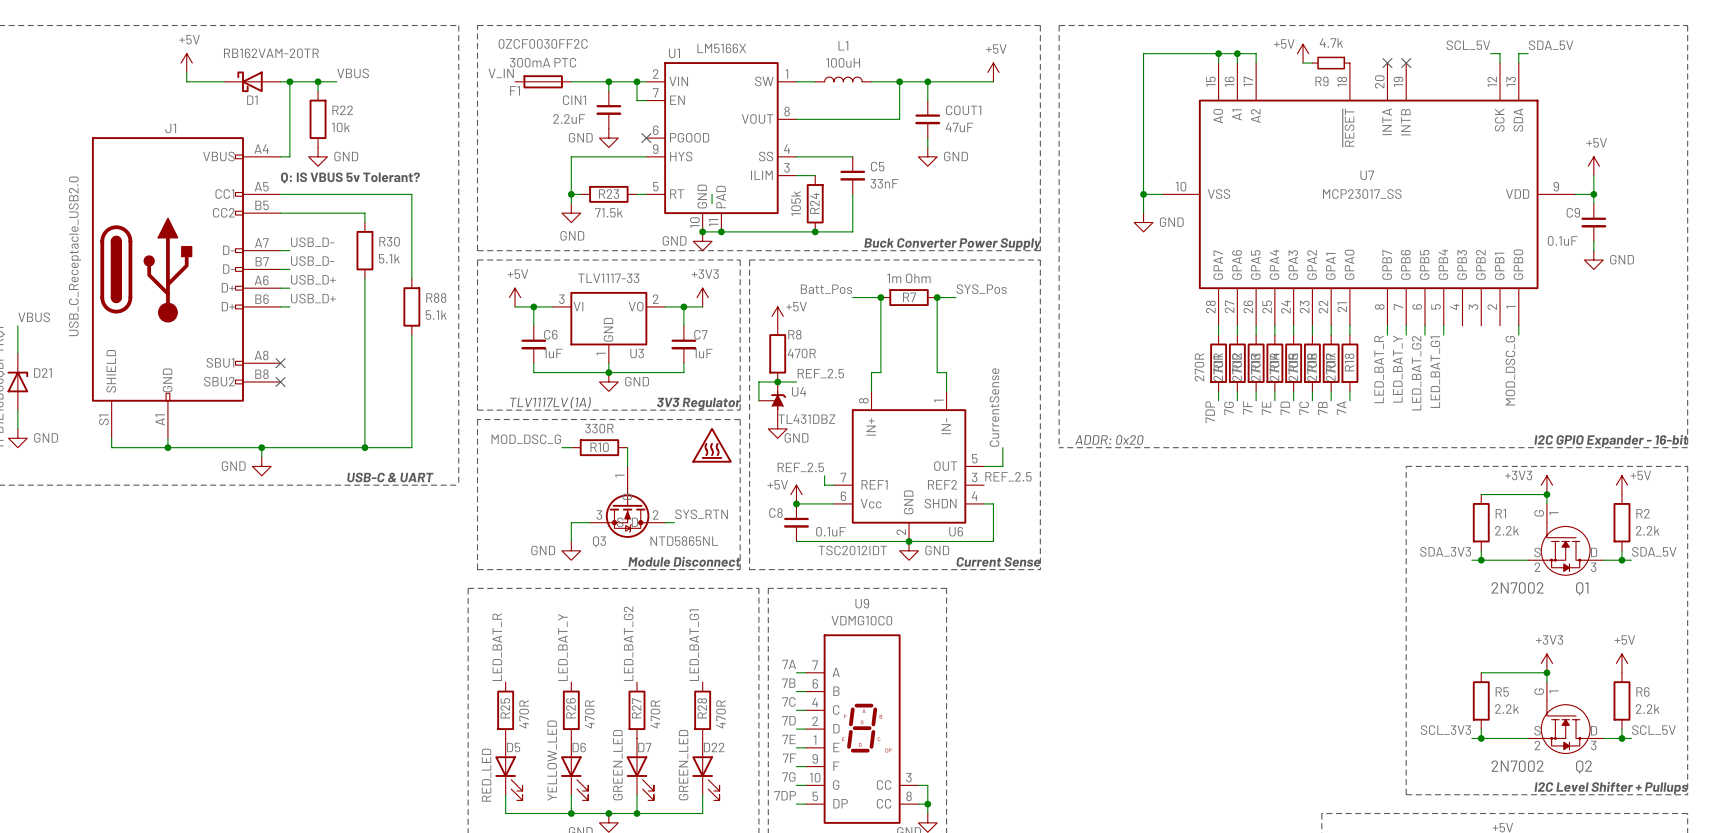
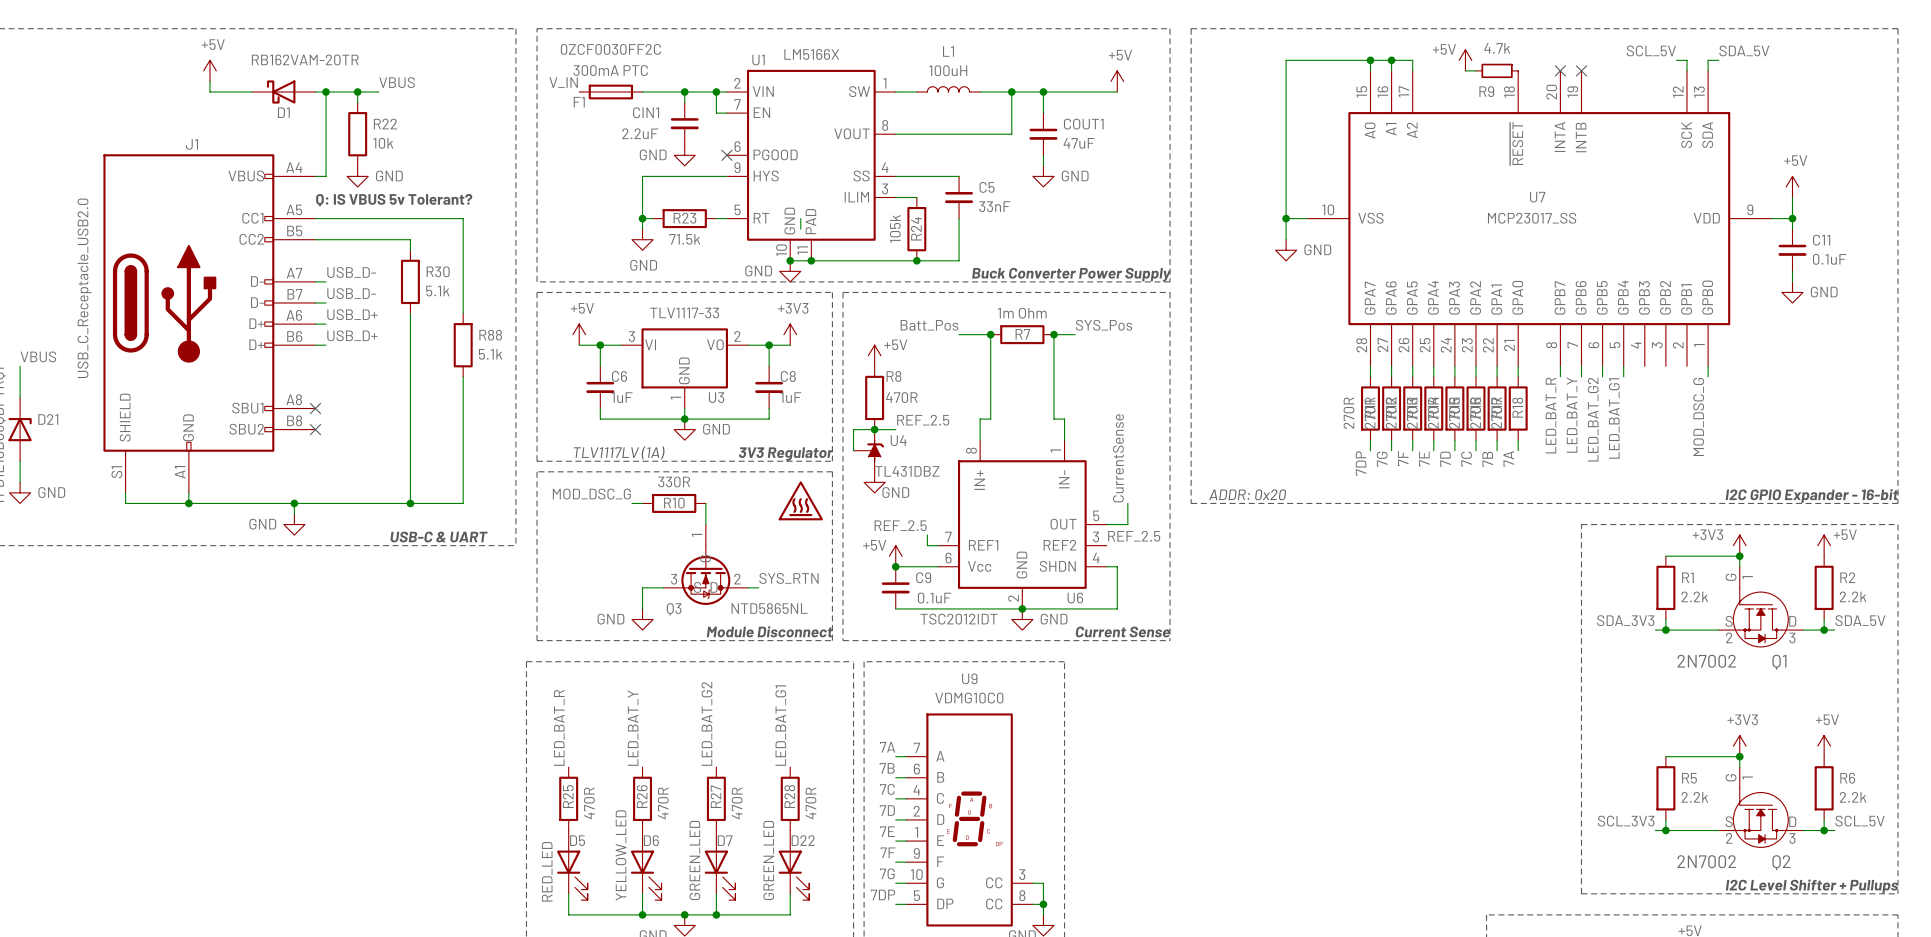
C9 name: C9 (1573, 212) -> C11 (1821, 240)
C9 value position: 0.1uF (1562, 240) -> 0.1uF (1829, 259)
C7 name: C7 (700, 334) -> C8 (788, 376)
C8 name: C8 (775, 512) -> C9 (923, 577)

